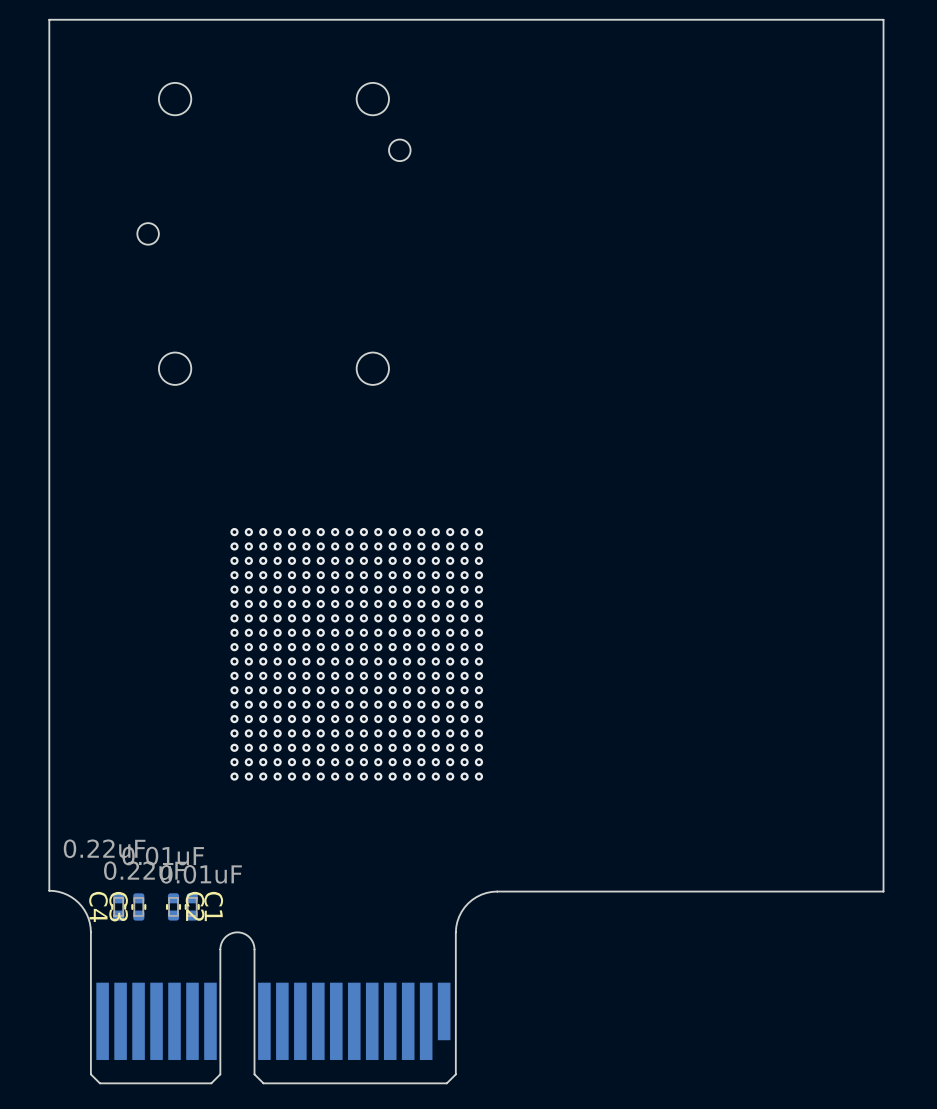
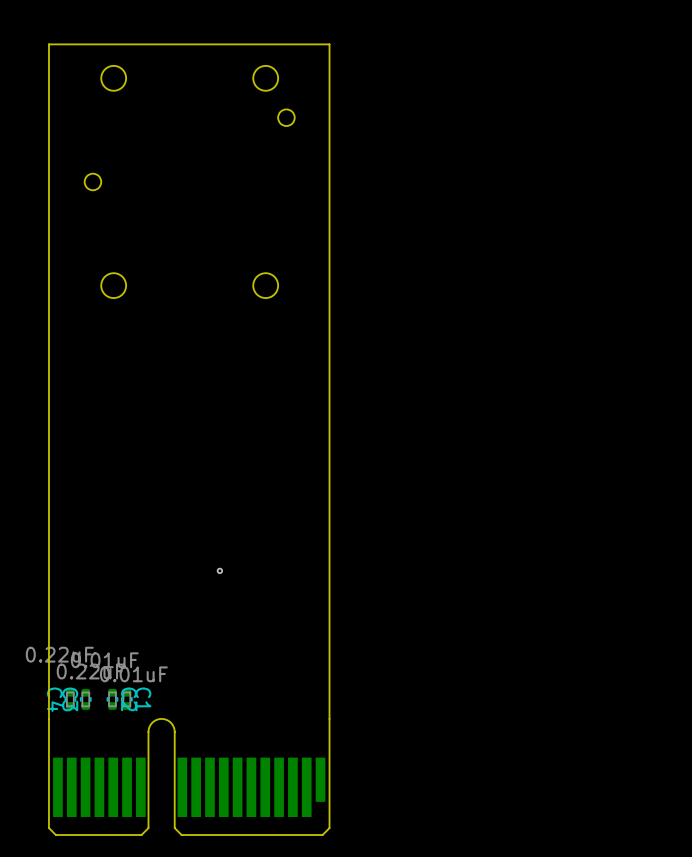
via: (234, 532) -> none
via: (248, 532) -> none
via: (263, 532) -> none
via: (277, 532) -> none
via: (292, 532) -> none
via: (306, 532) -> none
via: (320, 532) -> none
via: (335, 532) -> none
via: (349, 532) -> none
via: (363, 532) -> none
via: (378, 532) -> none
via: (392, 532) -> none
via: (407, 532) -> none
via: (421, 532) -> none
via: (435, 532) -> none
via: (450, 532) -> none
via: (464, 532) -> none
via: (478, 532) -> none
via: (234, 546) -> none
via: (248, 546) -> none
via: (263, 546) -> none
via: (277, 546) -> none
via: (292, 546) -> none
via: (306, 546) -> none
via: (320, 546) -> none
via: (335, 546) -> none
via: (349, 546) -> none
via: (363, 546) -> none
via: (378, 546) -> none
via: (392, 546) -> none
via: (407, 546) -> none
via: (421, 546) -> none
via: (435, 546) -> none
via: (450, 546) -> none
via: (464, 546) -> none
via: (478, 546) -> none
via: (234, 560) -> none
via: (248, 560) -> none
via: (263, 560) -> none
via: (277, 560) -> none
via: (292, 560) -> none
via: (306, 560) -> none
via: (320, 560) -> none
via: (335, 560) -> none
via: (349, 560) -> none
via: (363, 560) -> none
via: (378, 560) -> none
via: (392, 560) -> none
via: (407, 560) -> none
via: (421, 560) -> none
via: (435, 560) -> none
via: (450, 560) -> none
via: (464, 560) -> none
via: (478, 560) -> none
via: (234, 575) -> none
via: (248, 575) -> none
via: (263, 575) -> none
via: (277, 575) -> none
via: (292, 575) -> none
via: (306, 575) -> none
via: (320, 575) -> none
via: (335, 575) -> none
via: (349, 575) -> none
via: (363, 575) -> none
via: (378, 575) -> none
via: (392, 575) -> none
via: (407, 575) -> none
via: (421, 575) -> none
via: (435, 575) -> none
via: (450, 575) -> none
via: (464, 575) -> none
via: (478, 575) -> none
via: (234, 589) -> none
via: (248, 589) -> none
via: (263, 589) -> none
via: (277, 589) -> none
via: (292, 589) -> none
via: (306, 589) -> none
via: (320, 589) -> none
via: (335, 589) -> none
via: (349, 589) -> none
via: (363, 589) -> none
via: (378, 589) -> none
via: (392, 589) -> none
via: (407, 589) -> none
via: (421, 589) -> none
via: (435, 589) -> none
via: (450, 589) -> none
via: (464, 589) -> none
via: (478, 589) -> none
via: (234, 603) -> none
via: (248, 603) -> none
via: (263, 603) -> none
via: (277, 603) -> none
via: (292, 603) -> none
via: (306, 603) -> none
via: (320, 603) -> none
via: (335, 603) -> none
via: (349, 603) -> none
via: (363, 603) -> none
via: (378, 603) -> none
via: (392, 603) -> none
via: (407, 603) -> none
via: (421, 603) -> none
via: (435, 603) -> none
via: (450, 603) -> none
via: (464, 603) -> none
via: (478, 603) -> none
via: (234, 618) -> none
via: (248, 618) -> none
via: (263, 618) -> none
via: (277, 618) -> none
via: (292, 618) -> none
via: (306, 618) -> none
via: (320, 618) -> none
via: (335, 618) -> none
via: (349, 618) -> none
via: (363, 618) -> none
via: (378, 618) -> none
via: (392, 618) -> none
via: (407, 618) -> none
via: (421, 618) -> none
via: (435, 618) -> none
via: (450, 618) -> none
via: (464, 618) -> none
via: (478, 618) -> none
via: (234, 632) -> none
via: (248, 632) -> none
via: (263, 632) -> none
via: (277, 632) -> none
via: (292, 632) -> none
via: (306, 632) -> none
via: (320, 632) -> none
via: (335, 632) -> none
via: (349, 632) -> none
via: (363, 632) -> none
via: (378, 632) -> none
via: (392, 632) -> none
via: (407, 632) -> none
via: (421, 632) -> none
via: (435, 632) -> none
via: (450, 632) -> none
via: (464, 632) -> none
via: (478, 632) -> none
via: (234, 647) -> none
via: (248, 647) -> none
via: (263, 647) -> none
via: (277, 647) -> none
via: (292, 647) -> none
via: (306, 647) -> none
via: (320, 647) -> none
via: (335, 647) -> none
via: (349, 647) -> none
via: (363, 647) -> none
via: (378, 647) -> none
via: (392, 647) -> none
via: (407, 647) -> none
via: (421, 647) -> none
via: (435, 647) -> none
via: (450, 647) -> none
via: (464, 647) -> none
via: (478, 647) -> none
via: (234, 661) -> none
via: (248, 661) -> none
via: (263, 661) -> none
via: (277, 661) -> none
via: (292, 661) -> none
via: (306, 661) -> none
via: (320, 661) -> none
via: (335, 661) -> none
via: (349, 661) -> none
via: (363, 661) -> none
via: (378, 661) -> none
via: (392, 661) -> none
via: (407, 661) -> none
via: (421, 661) -> none
via: (435, 661) -> none
via: (450, 661) -> none
via: (464, 661) -> none
via: (478, 661) -> none
via: (234, 675) -> none
via: (248, 675) -> none
via: (263, 675) -> none
via: (277, 675) -> none
via: (292, 675) -> none
via: (306, 675) -> none
via: (320, 675) -> none
via: (335, 675) -> none
via: (349, 675) -> none
via: (363, 675) -> none
via: (378, 675) -> none
via: (392, 675) -> none
via: (407, 675) -> none
via: (421, 675) -> none
via: (435, 675) -> none
via: (450, 675) -> none
via: (464, 675) -> none
via: (478, 675) -> none
via: (234, 690) -> none
via: (248, 690) -> none
via: (263, 690) -> none
via: (277, 690) -> none
via: (292, 690) -> none
via: (306, 690) -> none
via: (320, 690) -> none
via: (335, 690) -> none
via: (349, 690) -> none
via: (363, 690) -> none
via: (378, 690) -> none
via: (392, 690) -> none
via: (407, 690) -> none
via: (421, 690) -> none
via: (435, 690) -> none
via: (450, 690) -> none
via: (464, 690) -> none
via: (478, 690) -> none
via: (234, 704) -> none
via: (248, 704) -> none
via: (263, 704) -> none
via: (277, 704) -> none
via: (292, 704) -> none
via: (306, 704) -> none
via: (320, 704) -> none
via: (335, 704) -> none
via: (349, 704) -> none
via: (363, 704) -> none
via: (378, 704) -> none
via: (392, 704) -> none
via: (407, 704) -> none
via: (421, 704) -> none
via: (435, 704) -> none
via: (450, 704) -> none
via: (464, 704) -> none
via: (478, 704) -> none
via: (234, 719) -> none
via: (248, 719) -> none
via: (263, 719) -> none
via: (277, 719) -> none
via: (292, 719) -> none
via: (306, 719) -> none
via: (320, 719) -> none
via: (335, 719) -> none
via: (349, 719) -> none
via: (363, 719) -> none
via: (378, 719) -> none
via: (392, 719) -> none
via: (407, 719) -> none
via: (421, 719) -> none
via: (435, 719) -> none
via: (450, 719) -> none
via: (464, 719) -> none
via: (478, 719) -> none
via: (234, 733) -> none
via: (248, 733) -> none
via: (263, 733) -> none
via: (277, 733) -> none
via: (292, 733) -> none
via: (306, 733) -> none
via: (320, 733) -> none
via: (335, 733) -> none
via: (349, 733) -> none
via: (363, 733) -> none
via: (378, 733) -> none
via: (392, 733) -> none
via: (407, 733) -> none
via: (421, 733) -> none
via: (435, 733) -> none
via: (450, 733) -> none
via: (464, 733) -> none
via: (478, 733) -> none
via: none -> (219, 570)
via: (234, 747) -> none
via: (248, 747) -> none
via: (263, 747) -> none
via: (277, 747) -> none
via: (292, 747) -> none
via: (306, 747) -> none
via: (320, 747) -> none
via: (335, 747) -> none
via: (349, 747) -> none
via: (363, 747) -> none
via: (378, 747) -> none
via: (392, 747) -> none
via: (407, 747) -> none
via: (421, 747) -> none
via: (435, 747) -> none
via: (450, 747) -> none
via: (464, 747) -> none
via: (478, 747) -> none
via: (234, 762) -> none
via: (248, 762) -> none
via: (263, 762) -> none
via: (277, 762) -> none
via: (292, 762) -> none
via: (306, 762) -> none
via: (320, 762) -> none
via: (335, 762) -> none
via: (349, 762) -> none
via: (363, 762) -> none
via: (378, 762) -> none
via: (392, 762) -> none
via: (407, 762) -> none
via: (421, 762) -> none
via: (435, 762) -> none
via: (450, 762) -> none
via: (464, 762) -> none
via: (478, 762) -> none
via: (234, 776) -> none
via: (248, 776) -> none
via: (263, 776) -> none
via: (277, 776) -> none
via: (292, 776) -> none
via: (306, 776) -> none
via: (320, 776) -> none
via: (335, 776) -> none
via: (349, 776) -> none
via: (363, 776) -> none
via: (378, 776) -> none
via: (392, 776) -> none
via: (407, 776) -> none
via: (421, 776) -> none
via: (435, 776) -> none
via: (450, 776) -> none
via: (464, 776) -> none
via: (478, 776) -> none
board edge: (455, 932) (459, 916) (468, 903) (481, 894) (491, 891) (883, 891) (883, 19) (49, 19) (49, 890) (63, 893) (78, 902) (86, 914) (90, 932) -> (329, 718) (329, 44) (48, 44) (48, 718)

